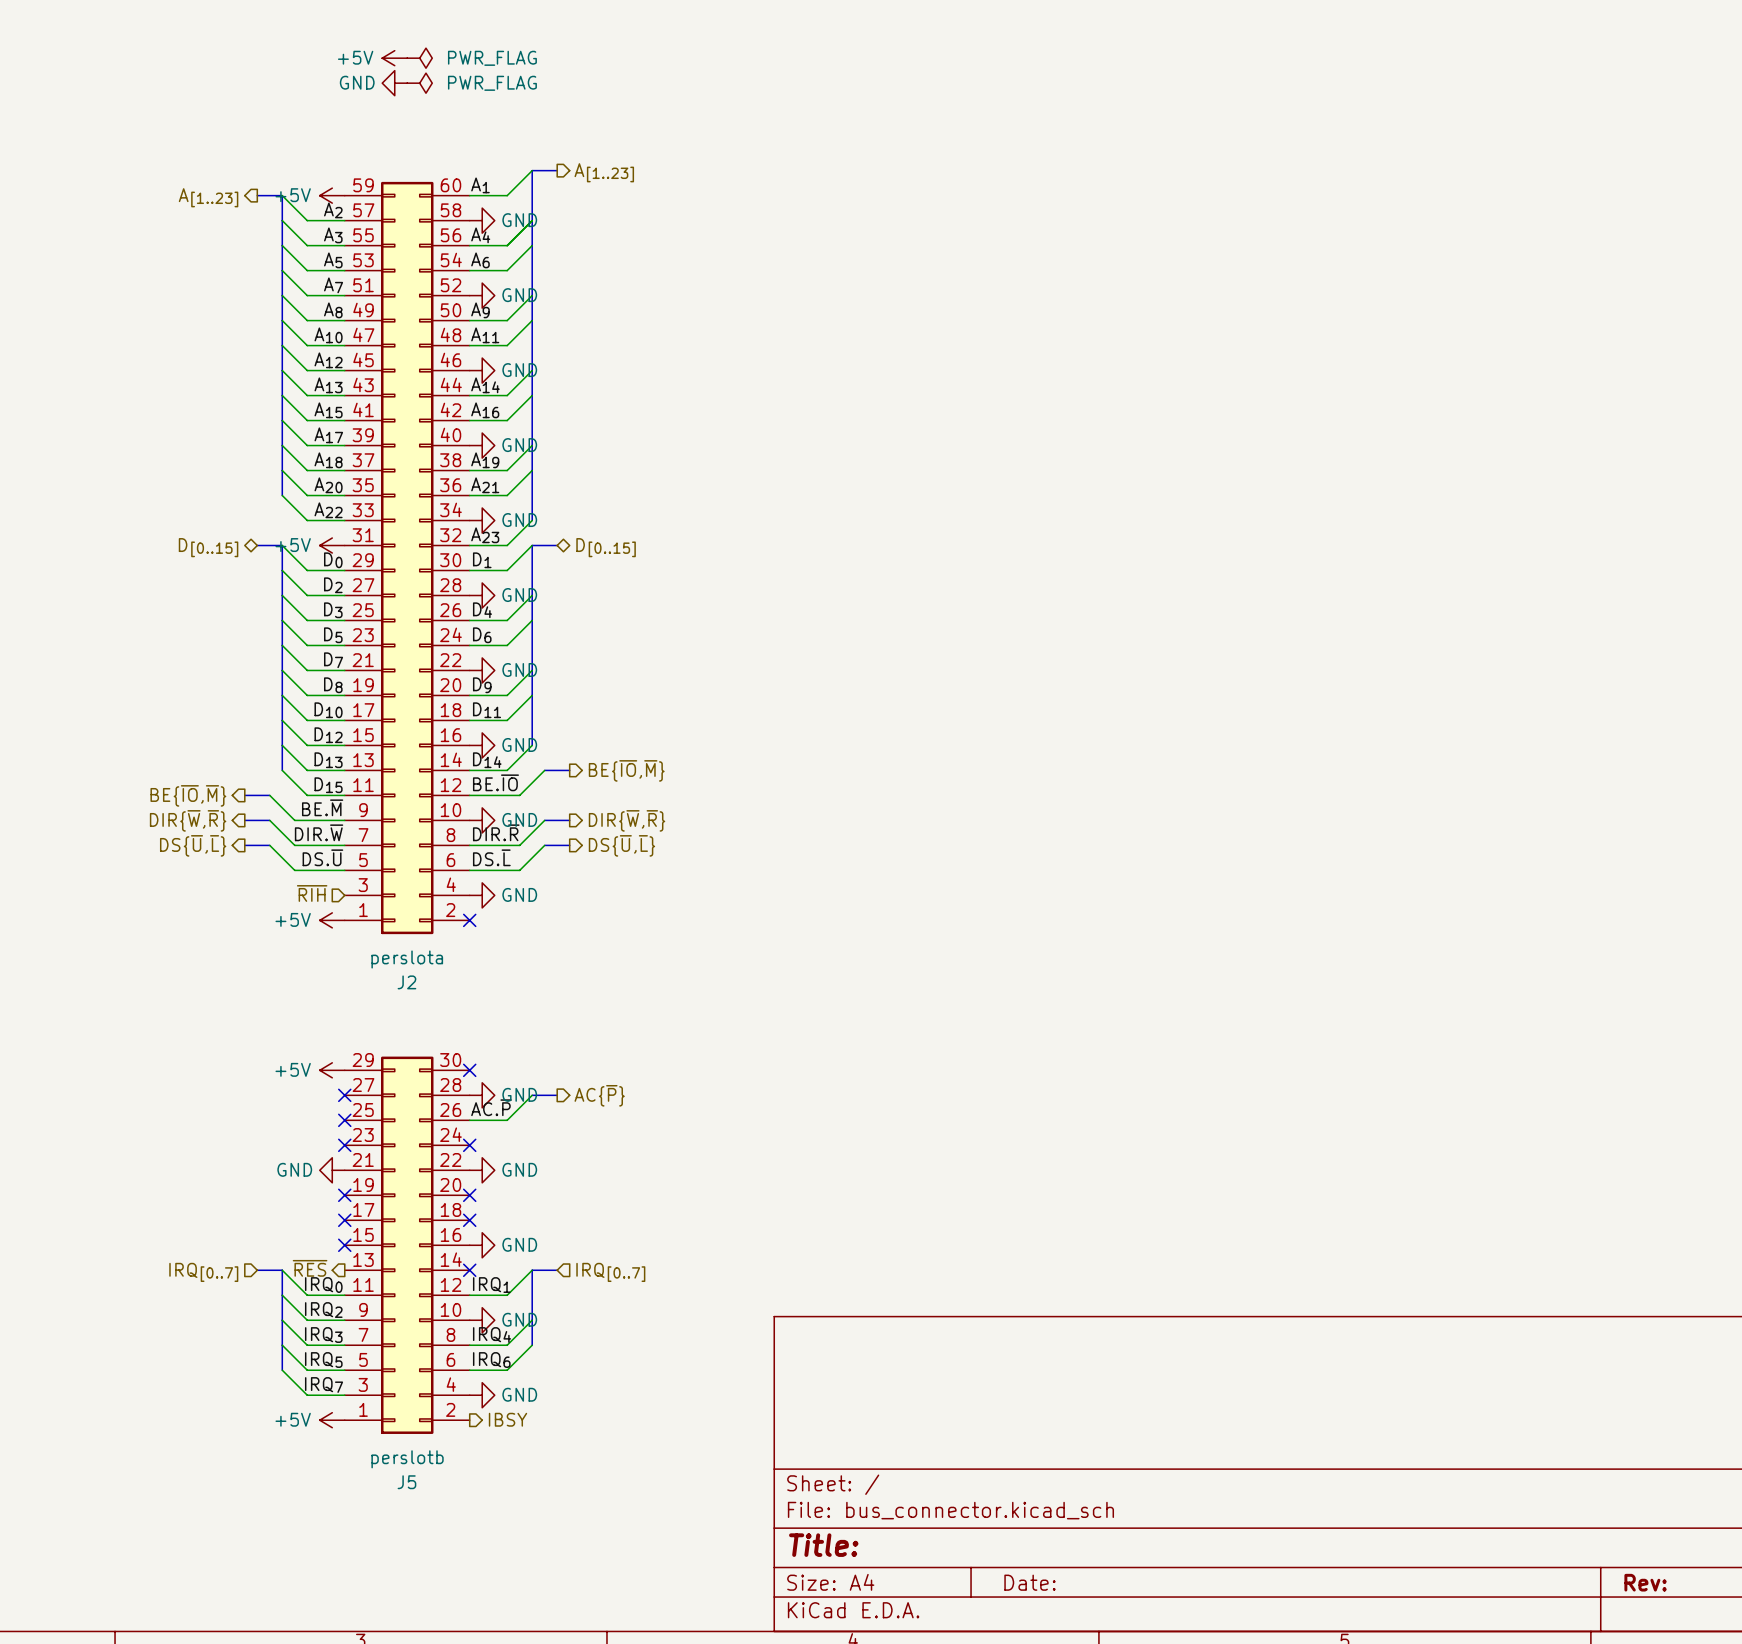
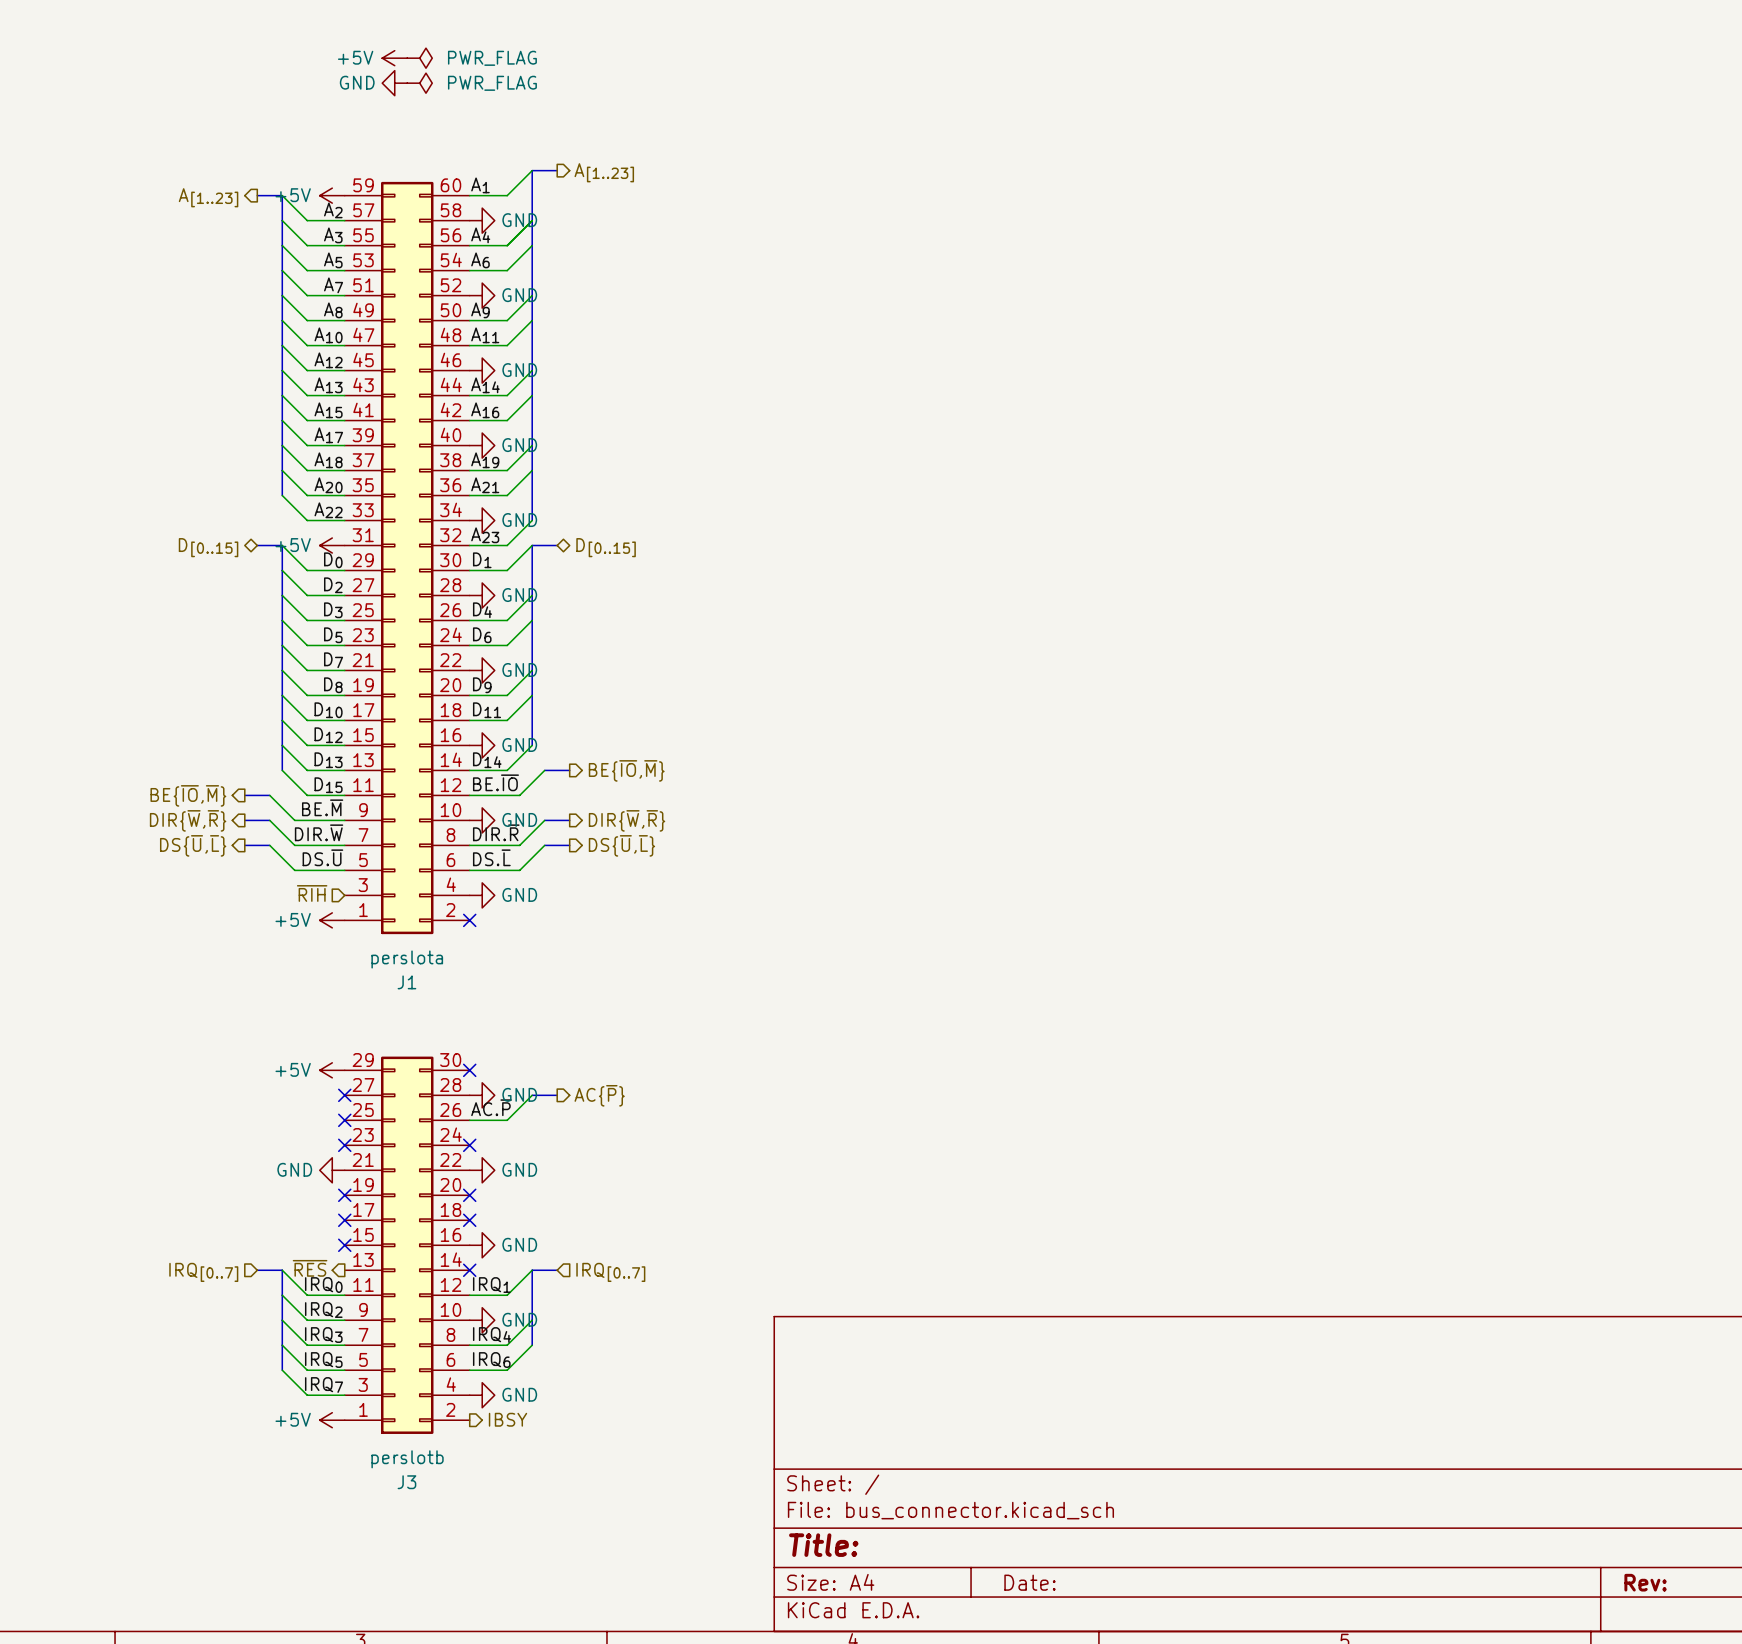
J2 name: J2 (406, 982) -> J1 (406, 982)
J5 name: J5 (406, 1482) -> J3 (406, 1482)

